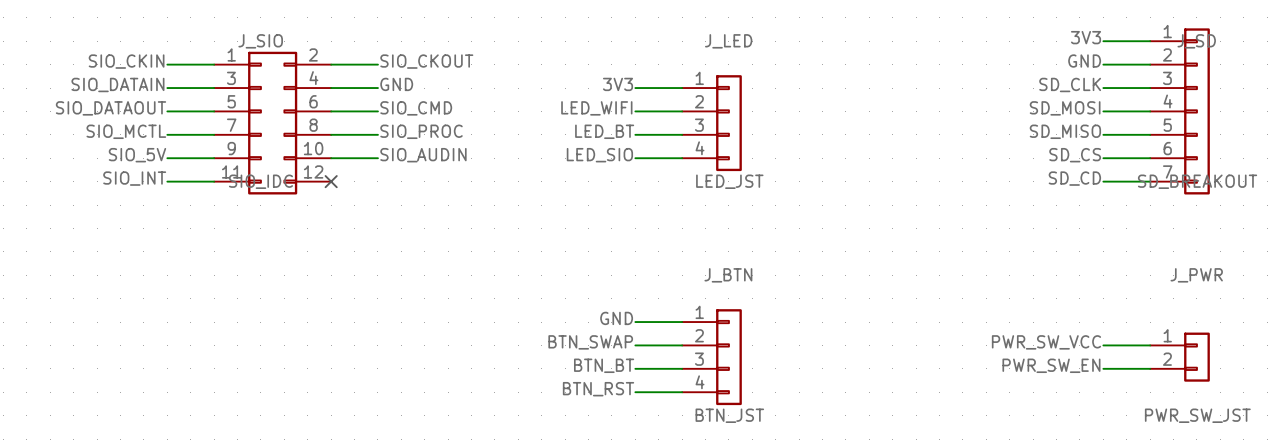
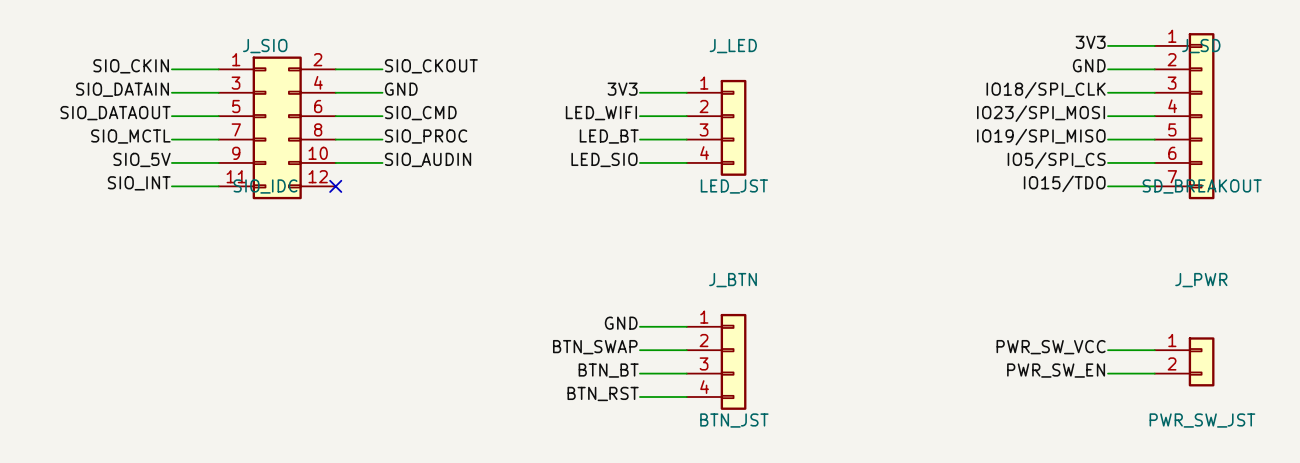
label: SD_CLK (1070, 84) -> IO18/SPI_CLK (1046, 90)
label: SD_MOSI (1065, 108) -> IO23/SPI_MOSI (1041, 113)
label: SD_MISO (1065, 131) -> IO19/SPI_MISO (1041, 137)
label: SD_CS (1075, 155) -> IO5/SPI_CS (1056, 160)
label: SD_CD (1074, 178) -> IO15/TDO (1064, 183)

